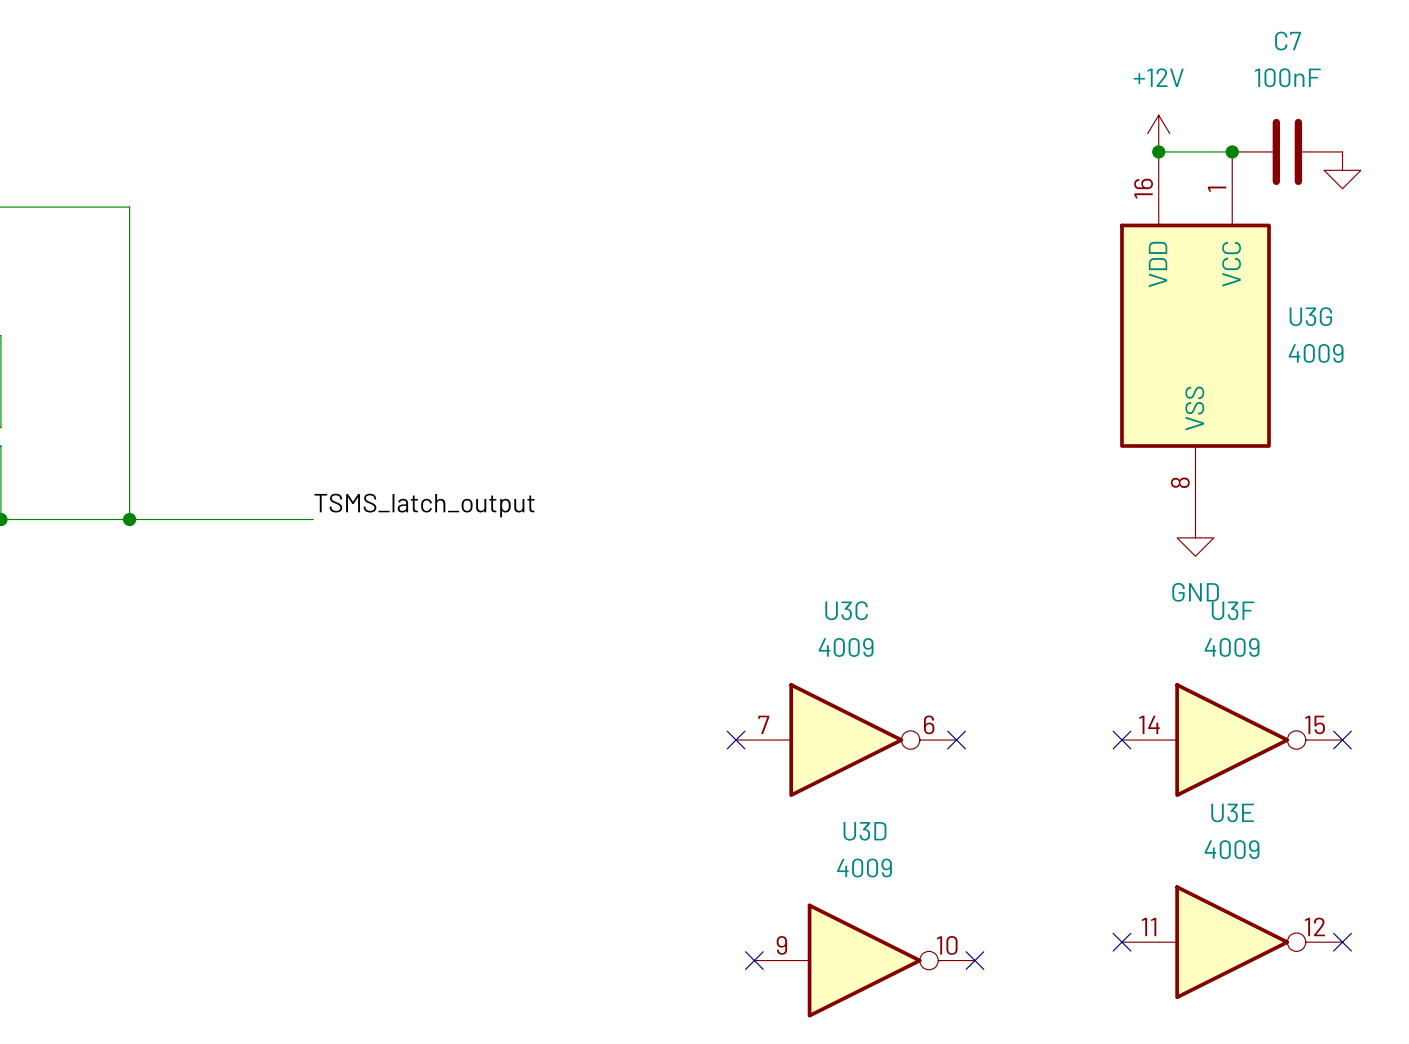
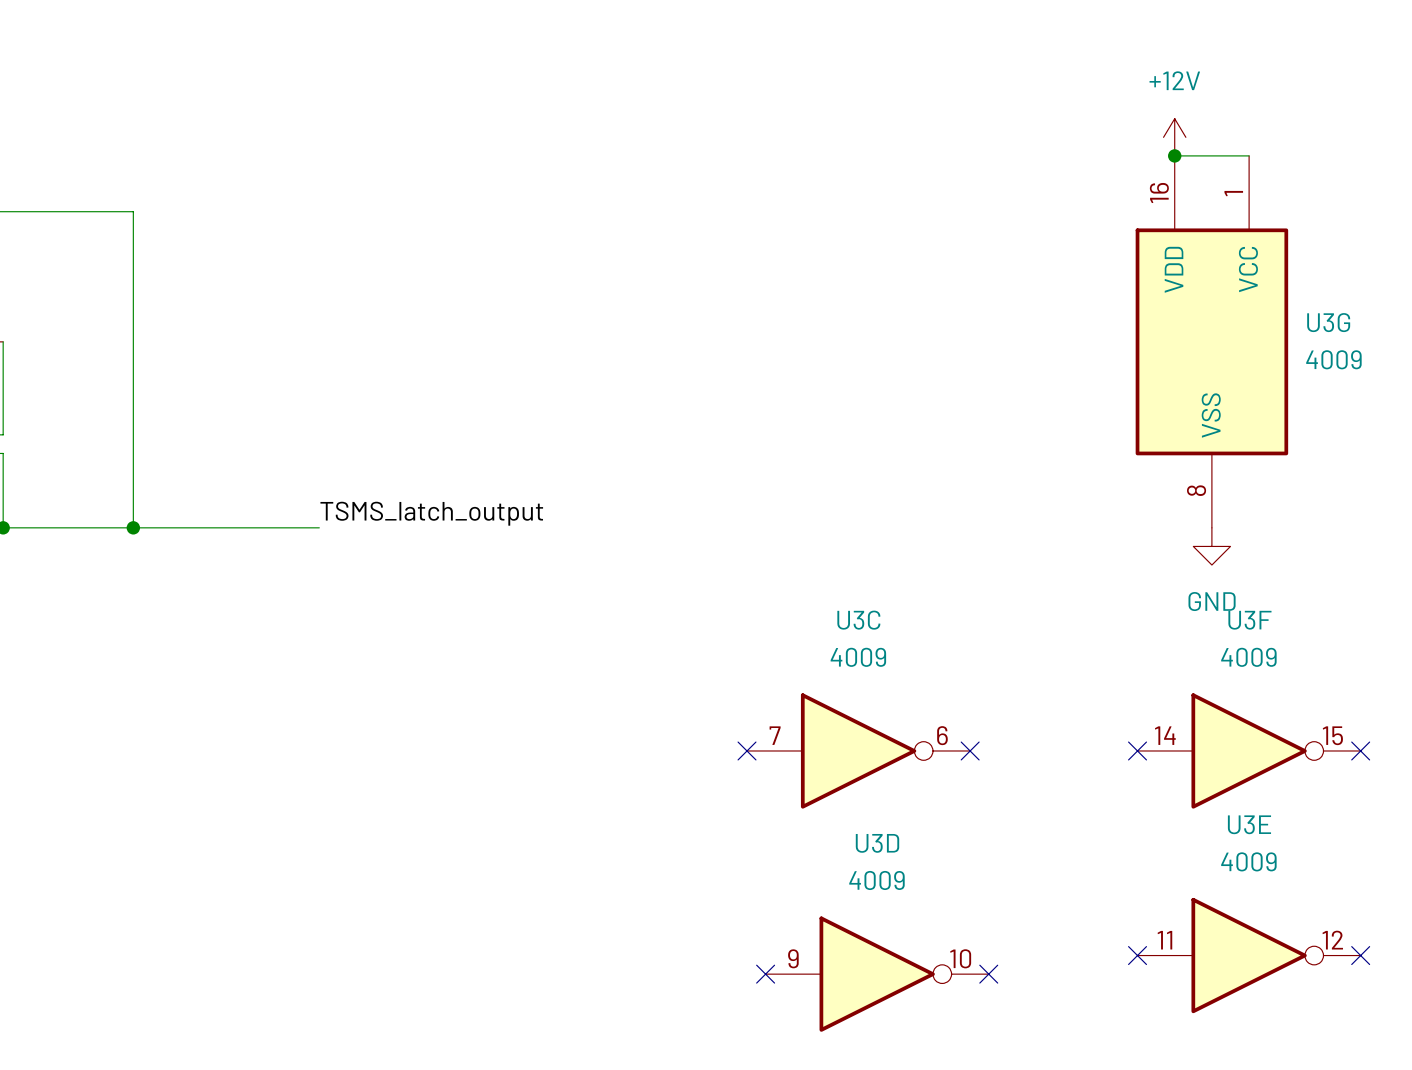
junction: (1232, 151) -> none
C7: 100nF (1287, 151) -> none
power symbol: (1342, 170) -> none

